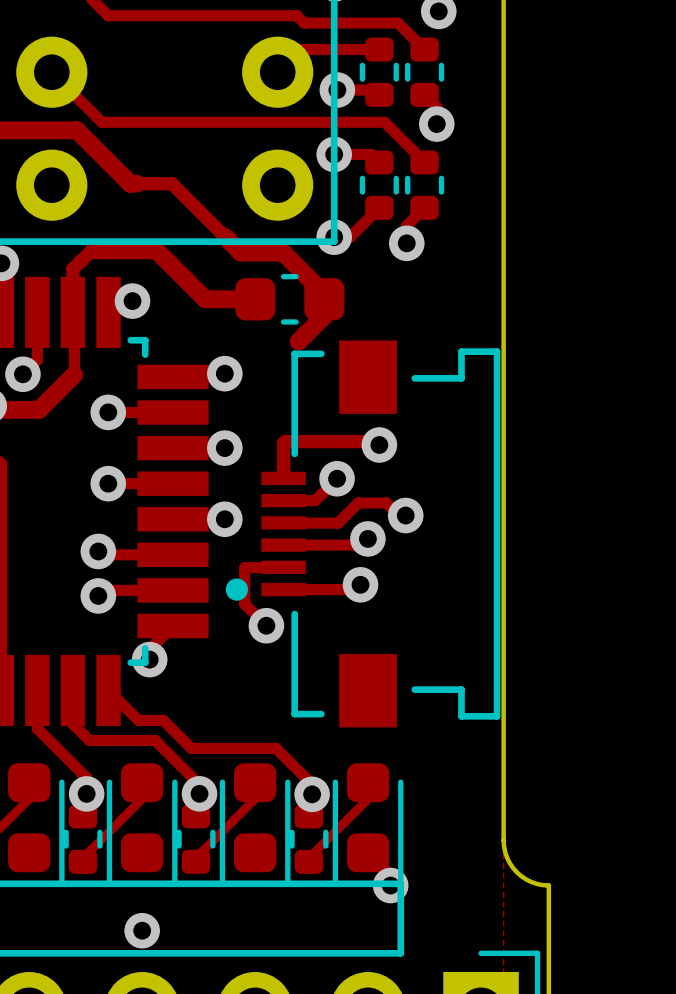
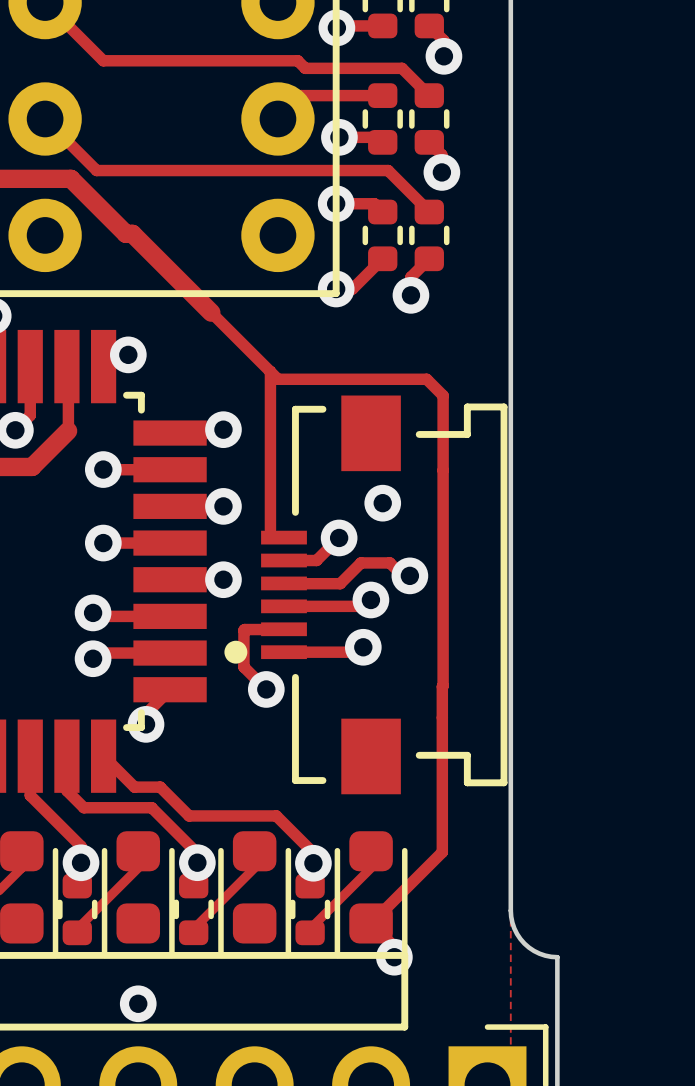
track: (136, 183) (171, 183) (240, 252) (283, 252) (324, 293) (324, 315) (298, 341) -> (132, 233) (277, 379) (426, 379) (443, 395) (442, 852) (371, 923)
track: (255, 299) (205, 299) (156, 250) (91, 250) (72, 269) (72, 312) -> none
part: (289, 299) -> none
track: none -> (270, 371) (270, 530)
track: (379, 444) (376, 441) (285, 441) (283, 443) (283, 478) -> none

